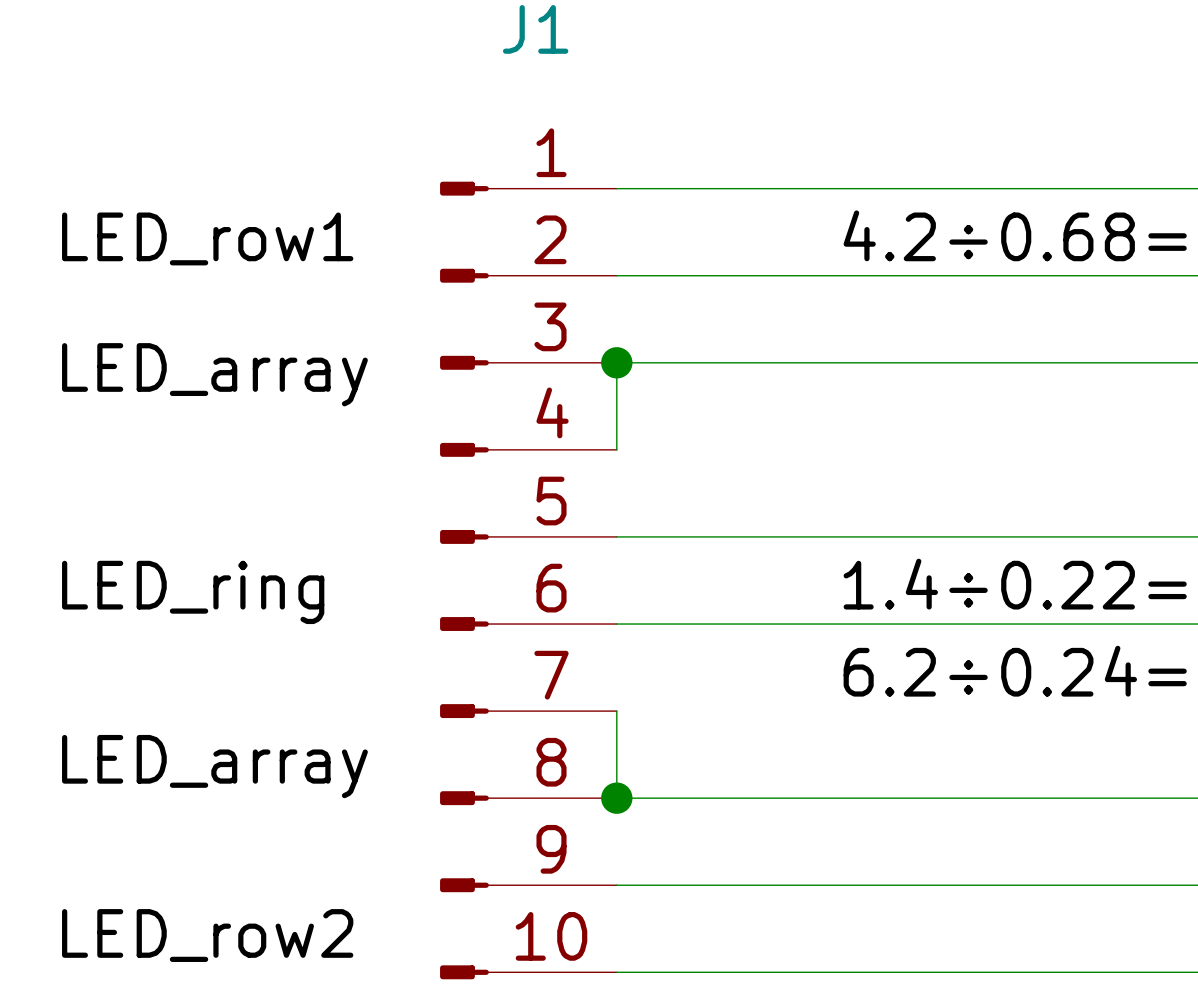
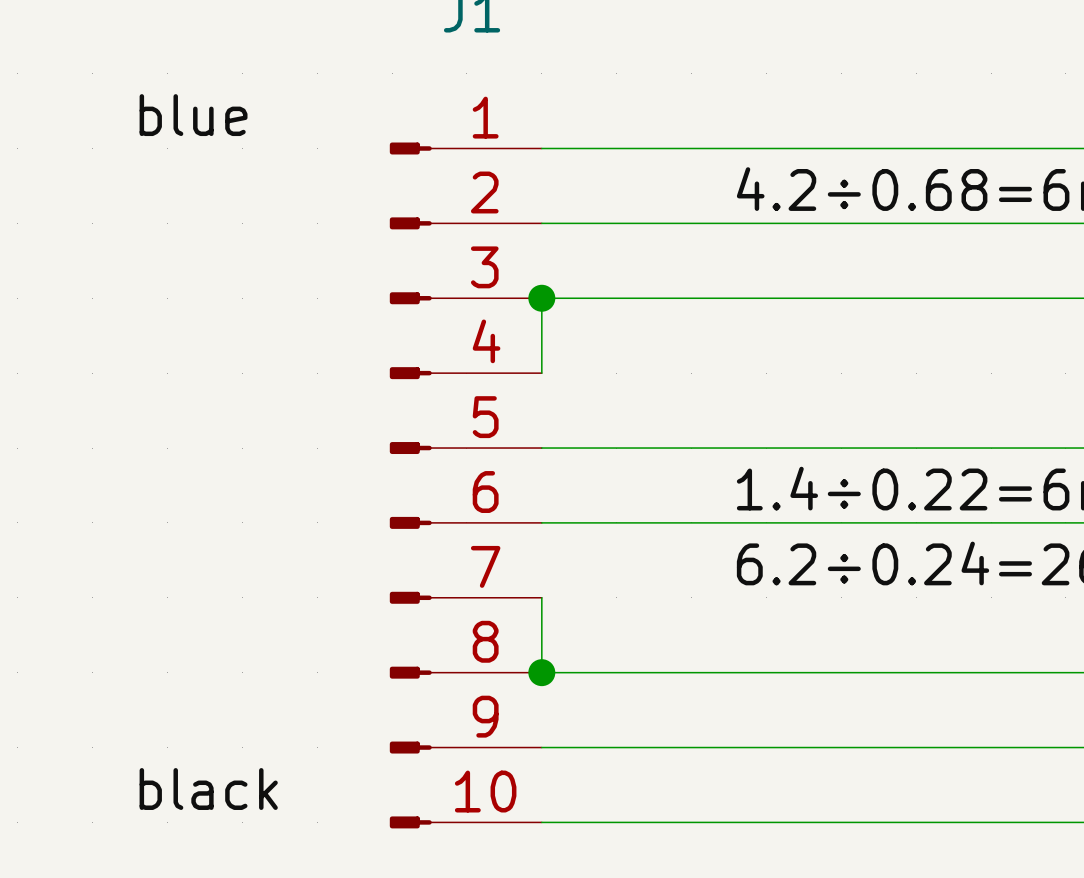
label: none -> blue (193, 115)
label: LED_row1 (207, 238) -> none
label: LED_array (214, 374) -> none
label: LED_ring (193, 592) -> none
label: LED_array (214, 766) -> none
label: none -> black (208, 789)
label: LED_row2 (207, 935) -> none

